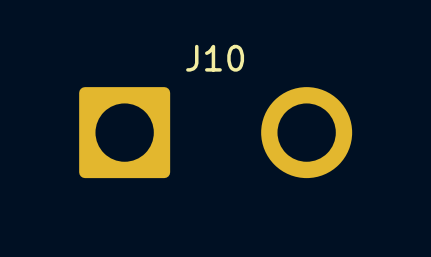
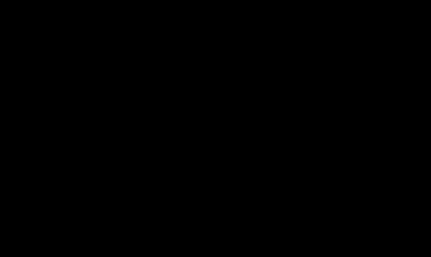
J10: (215, 132) -> none

